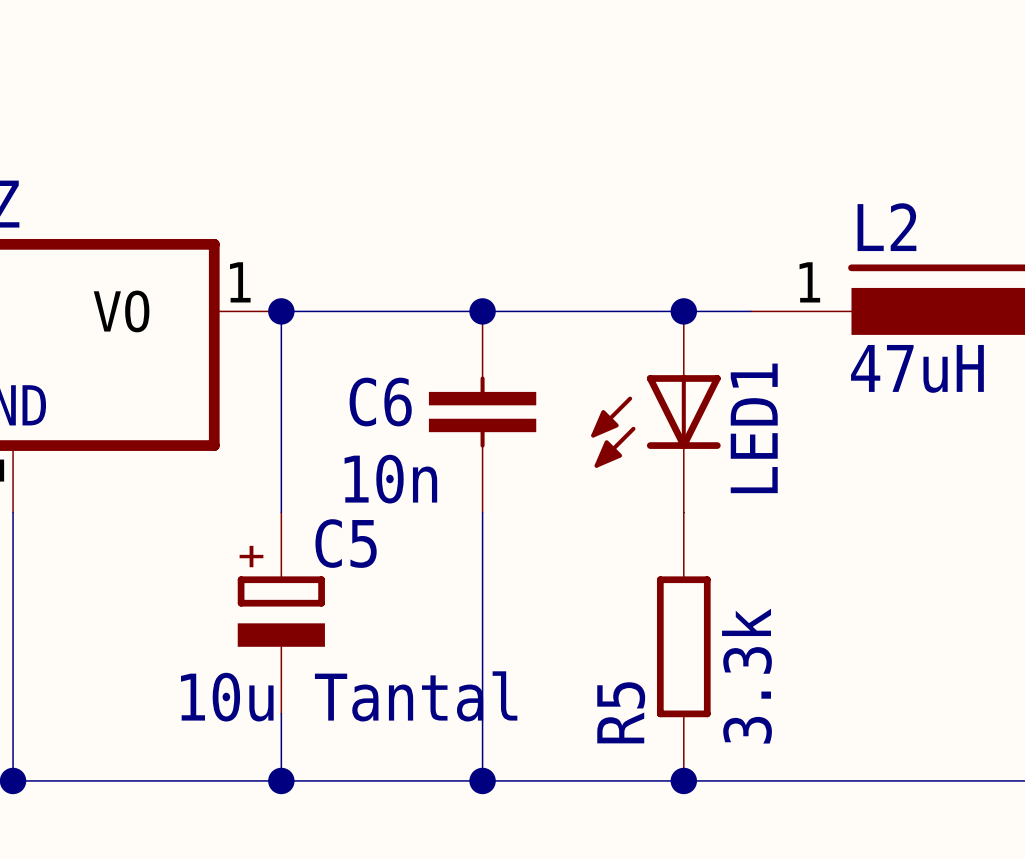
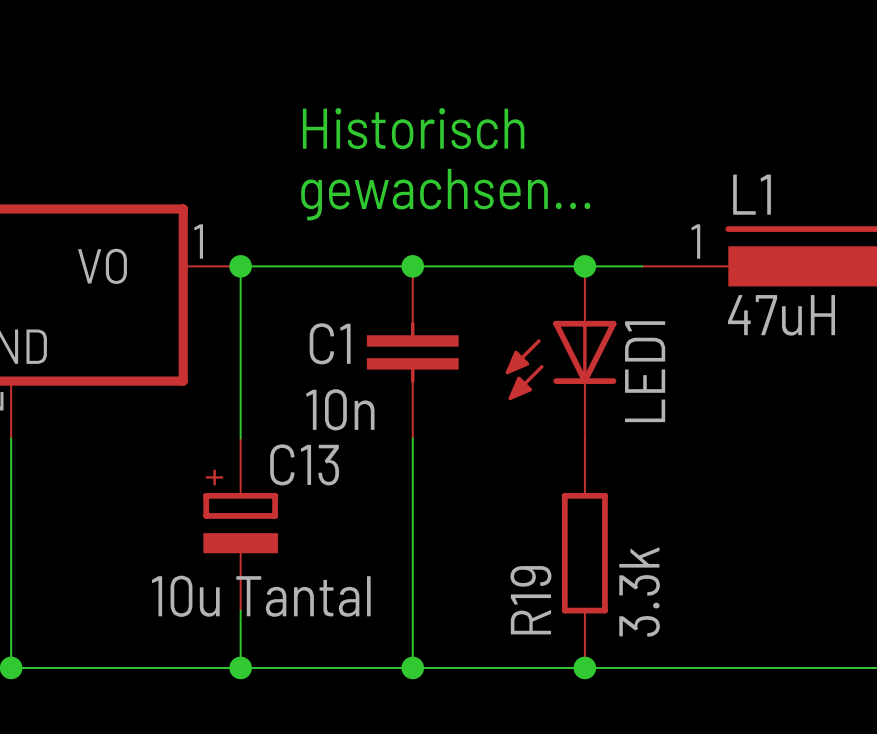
text: none -> Historisch (413, 128)
text: none -> gewachsen... (445, 194)
L2 name: L2 (886, 227) -> L1 (752, 194)
C6 name: C6 (380, 402) -> C1 (330, 343)
C5 name: C5 (346, 543) -> C13 (304, 464)
R5 name: R5 (621, 712) -> R19 (530, 600)

